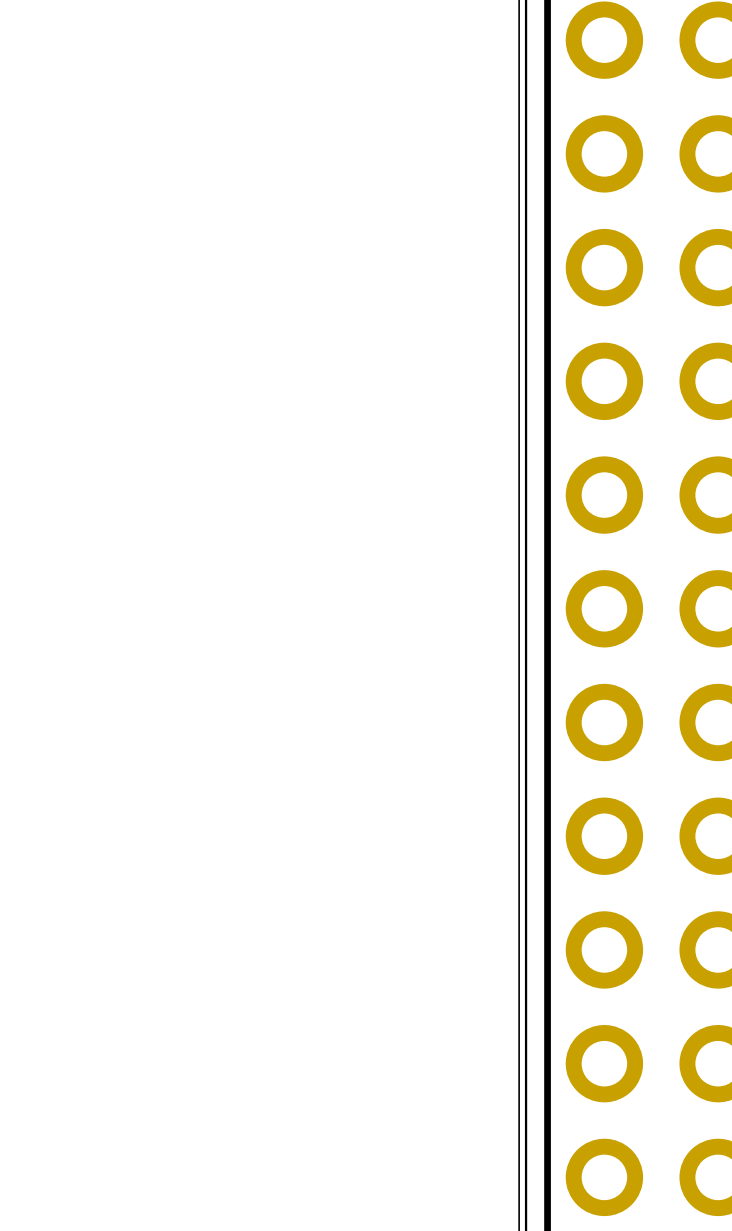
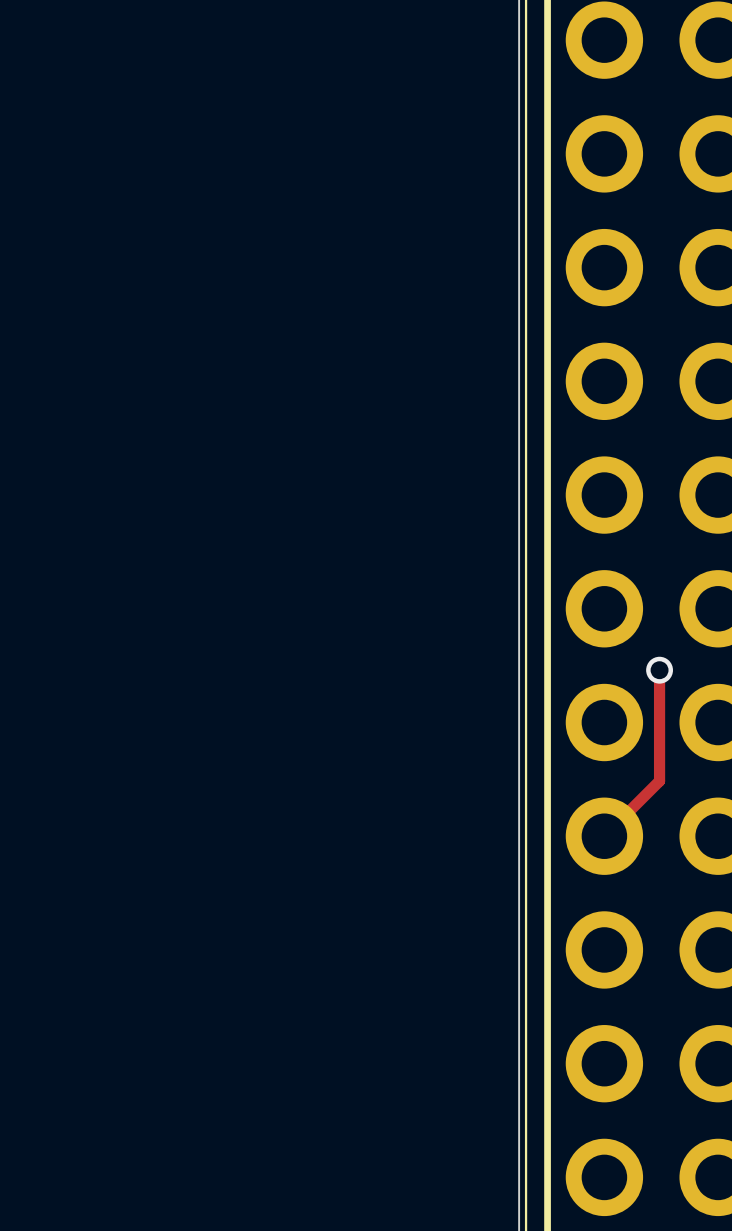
track: none -> (659, 670) (659, 781) (604, 836)
via: none -> (659, 670)

